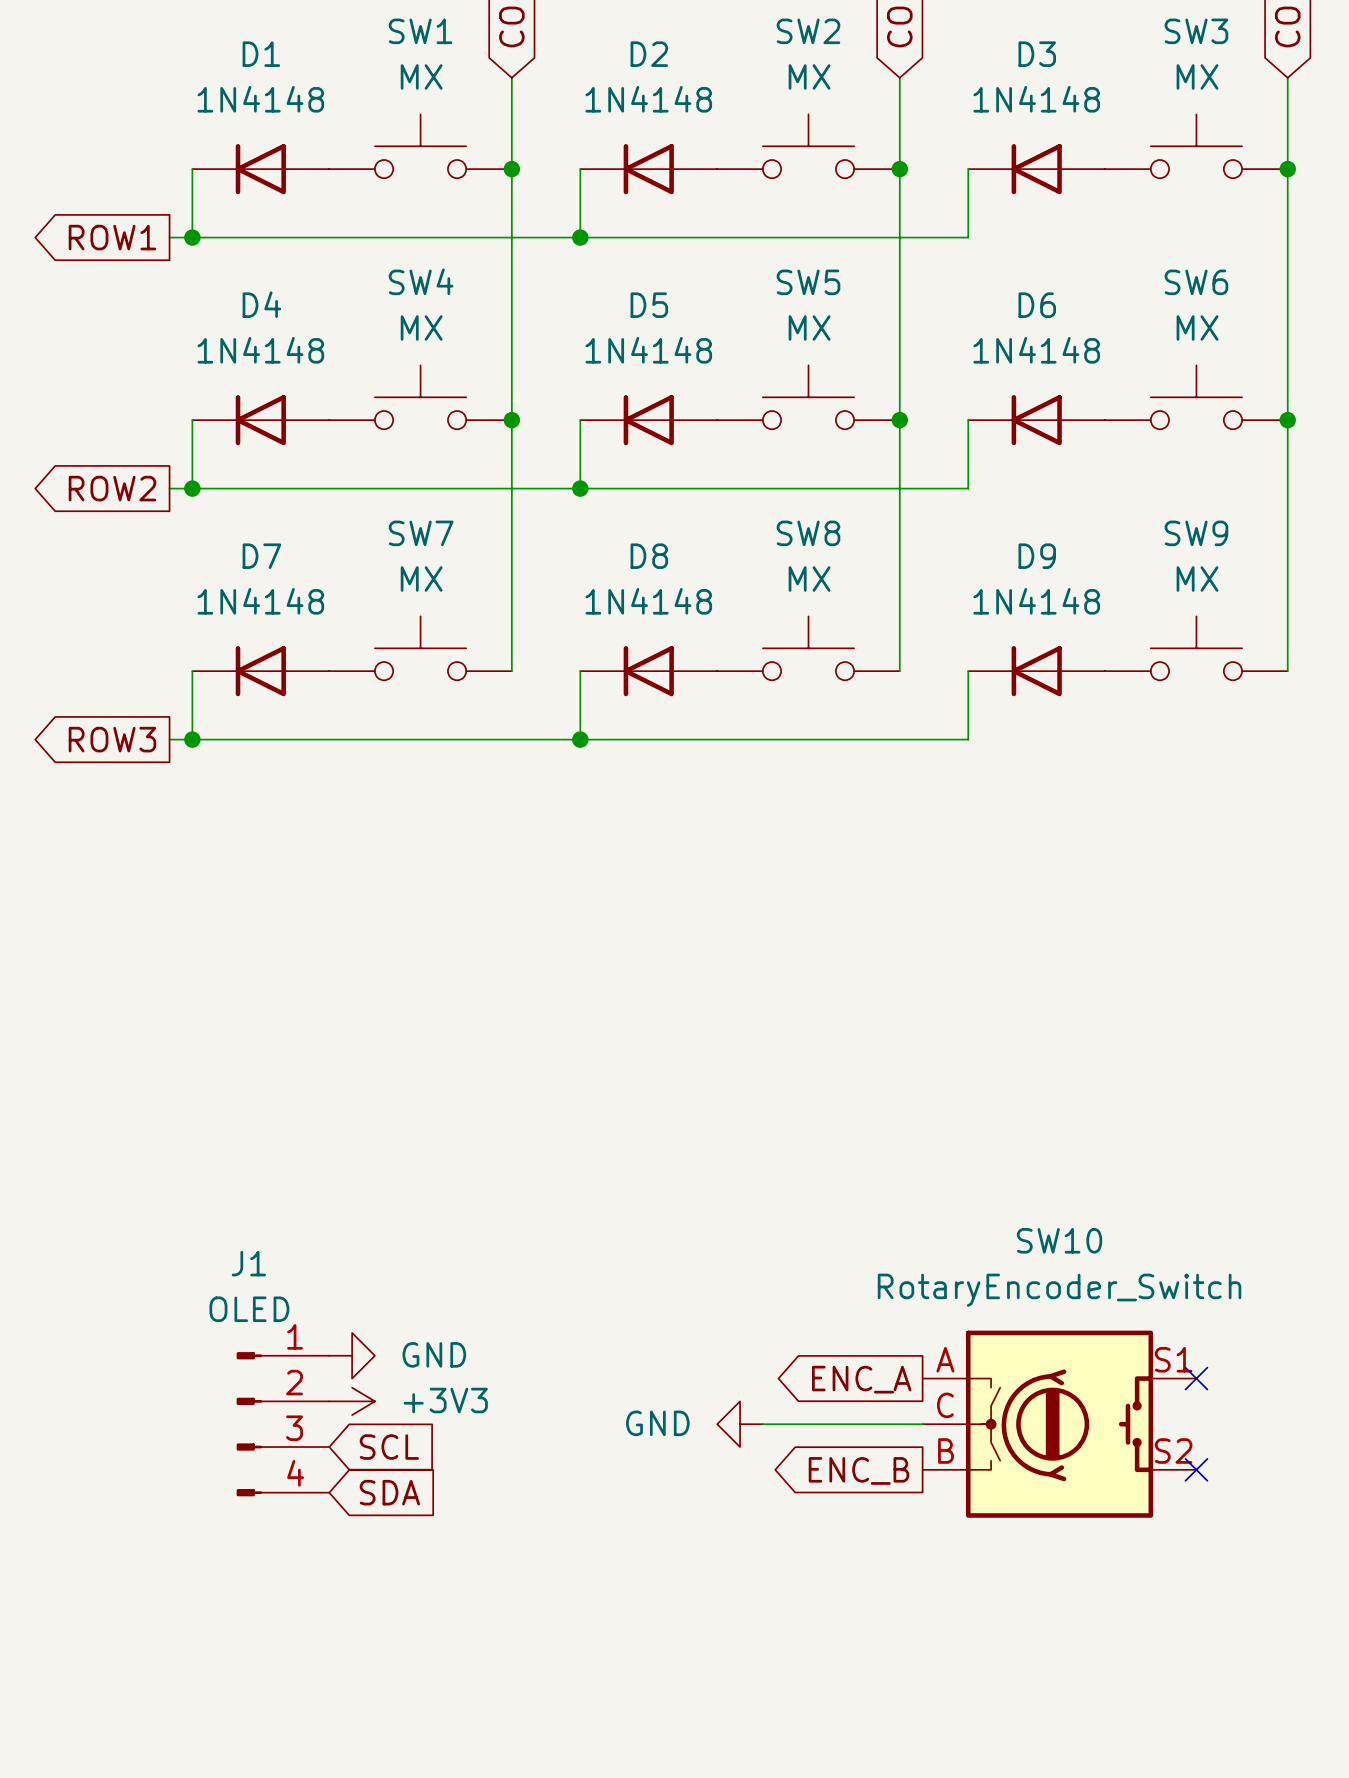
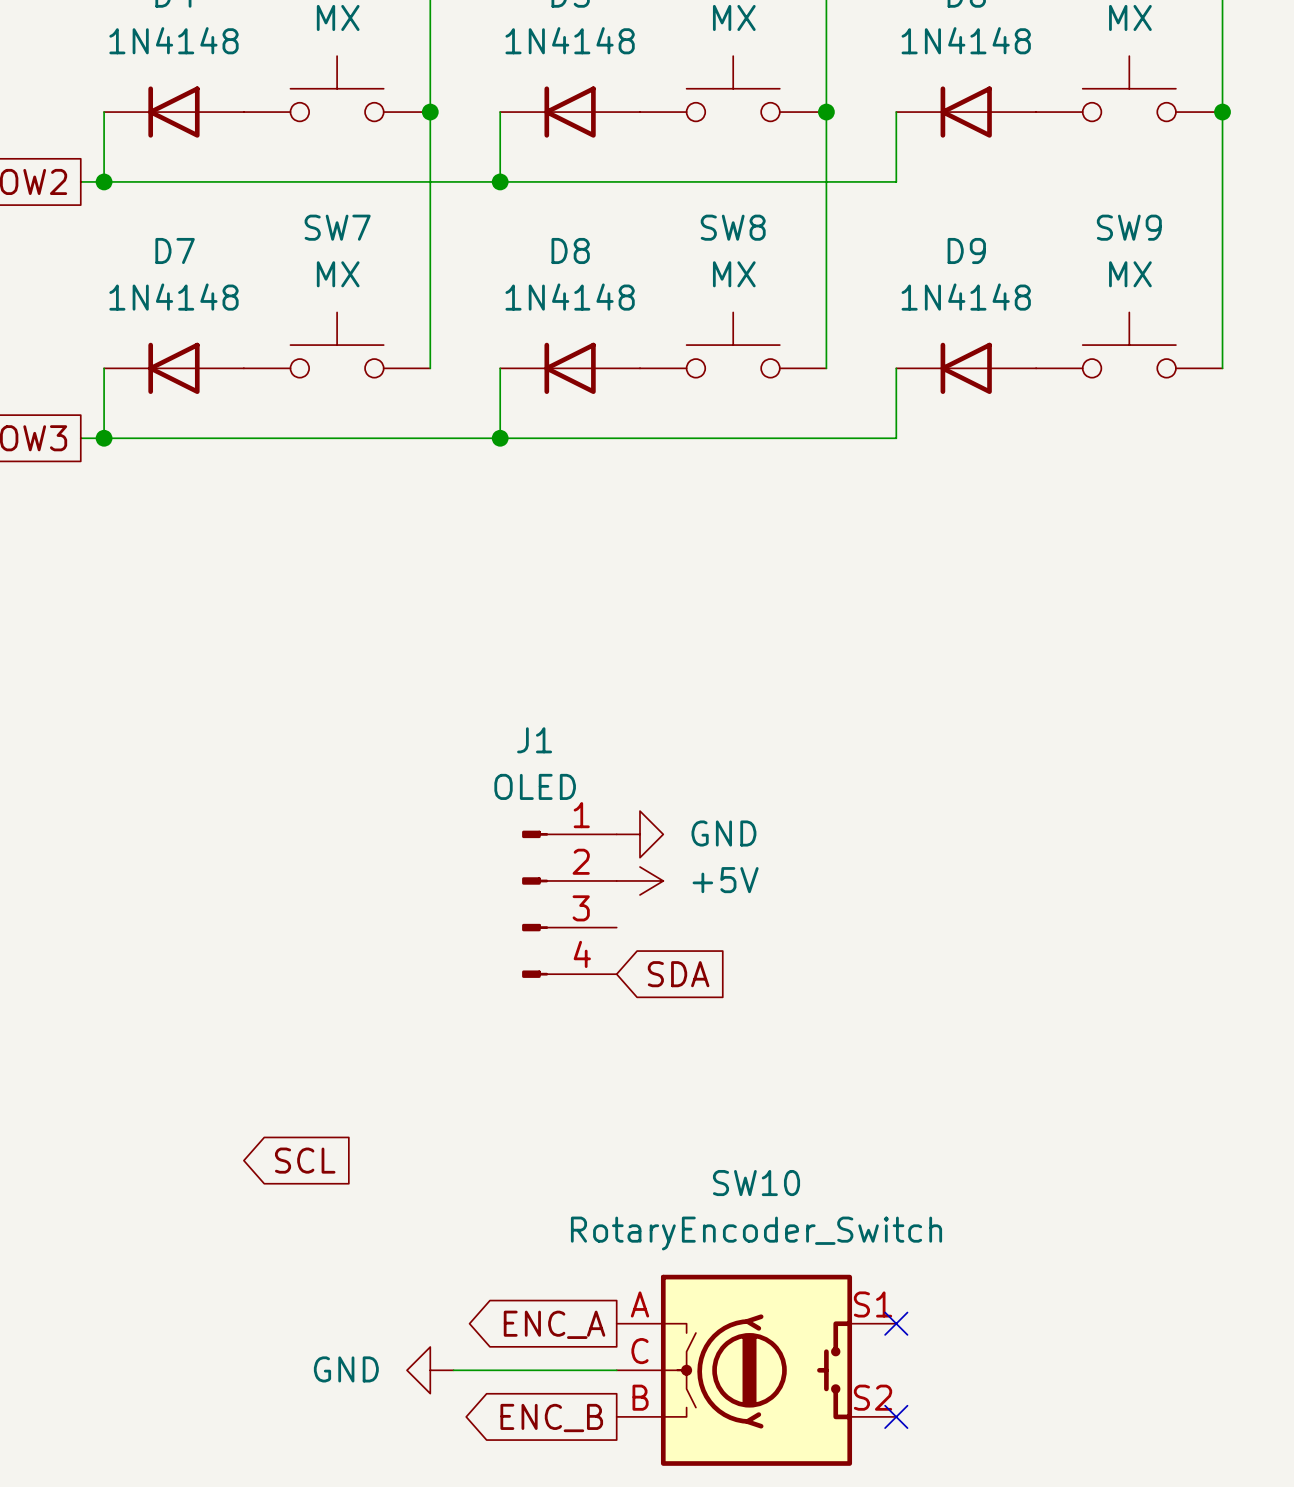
power symbol: none -> GND (640, 834)
power symbol: none -> +5V (640, 880)
power symbol: GND (352, 1355) -> none
no-connect mark: (1196, 1378) -> none
global label position: ENC_A (861, 1379) -> ENC_A (554, 1324)
power symbol: +3V3 (352, 1401) -> none
J1 position: (282, 1424) -> (569, 904)
power symbol: GND (740, 1424) -> none
wire: (762, 1424) (922, 1424) -> (453, 1370) (616, 1370)
SW10 position: (1059, 1424) -> (756, 1370)
no-connect mark: (1196, 1469) -> none
global label position: ENC_B (859, 1470) -> ENC_B (551, 1418)
global label position: SDA (389, 1492) -> SDA (678, 974)
no-connect mark: none -> (896, 1323)
power symbol: none -> GND (430, 1370)
no-connect mark: none -> (896, 1416)

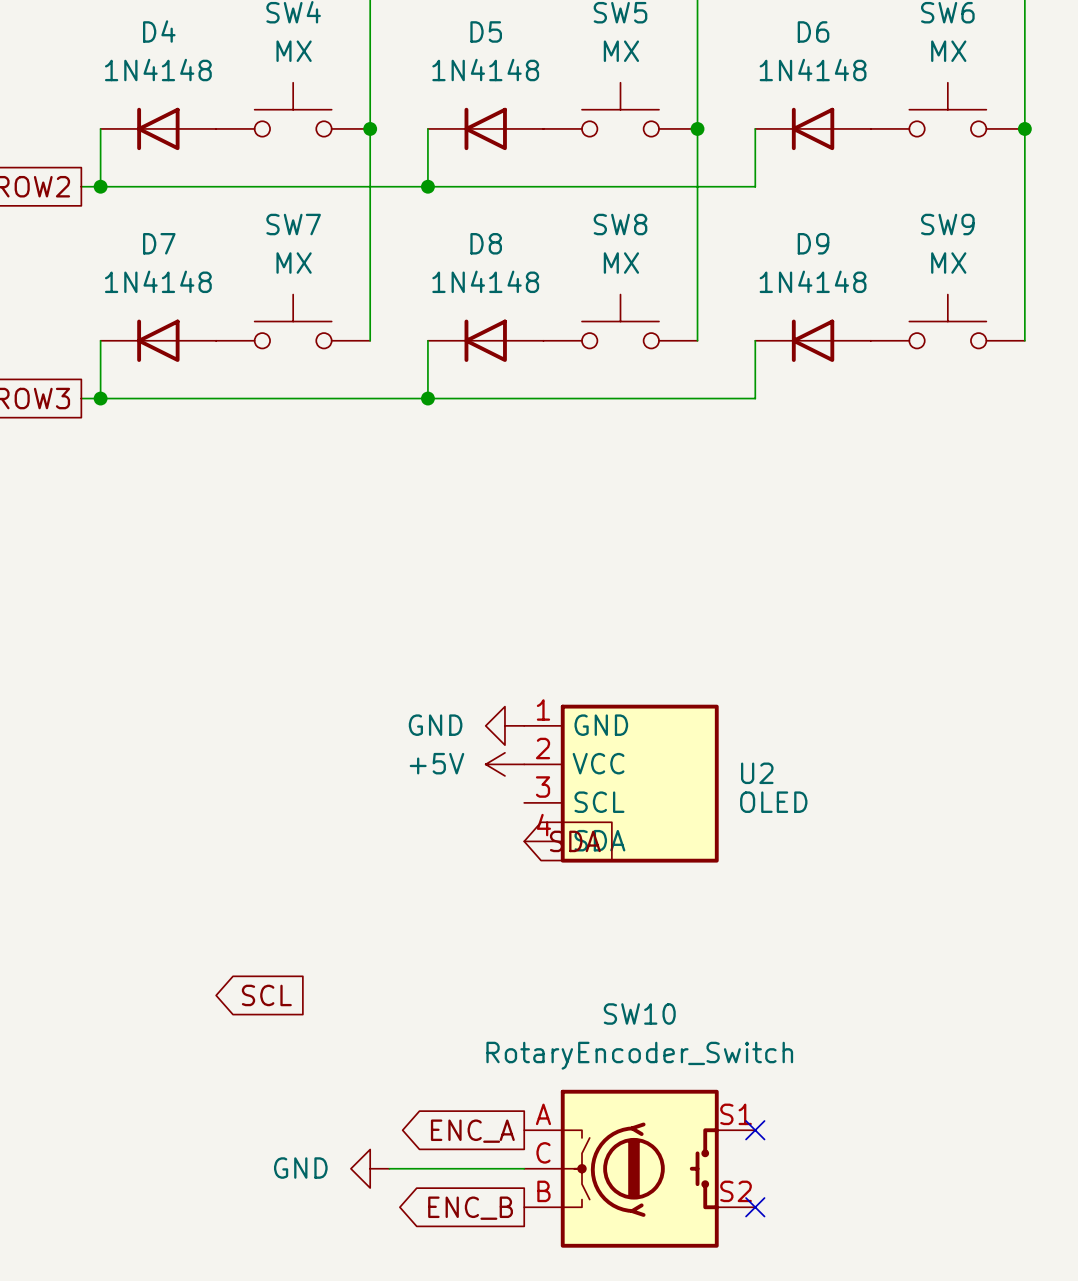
power symbol rotation: 0° (640, 834) -> 180° (504, 725)
power symbol position: GND (640, 834) -> GND (504, 725)
power symbol rotation: 0° (640, 880) -> 180° (504, 764)
power symbol position: +5V (640, 880) -> +5V (504, 764)
J1: OLED (569, 904) -> none
U2: none -> OLED (621, 783)

